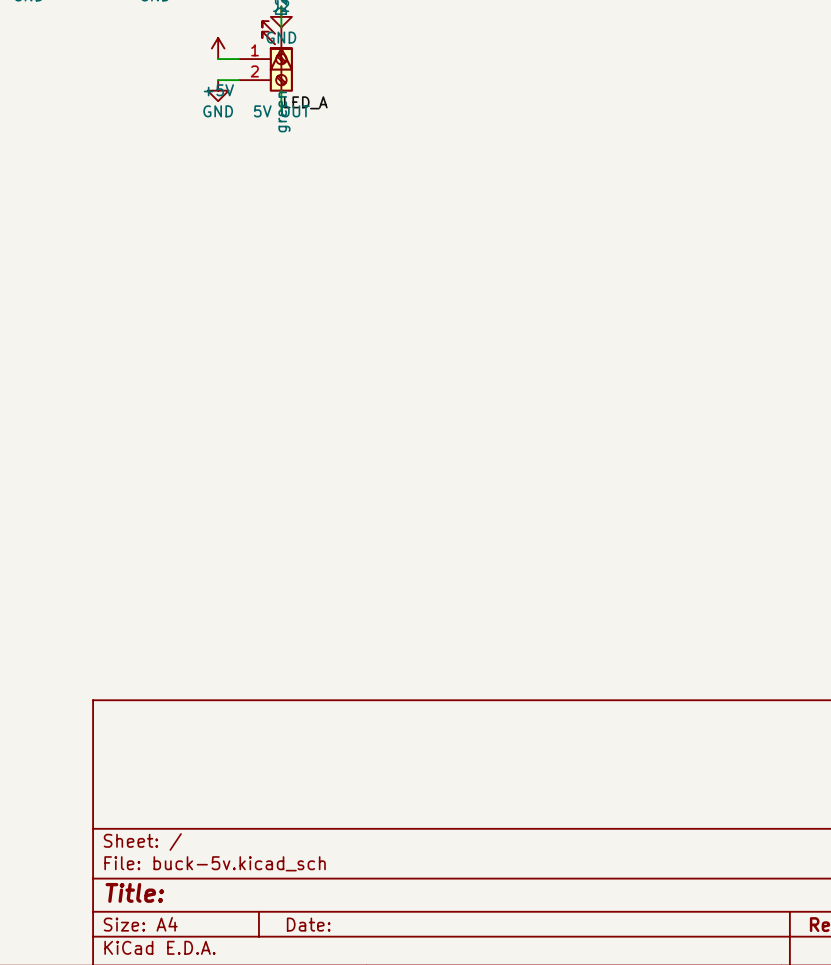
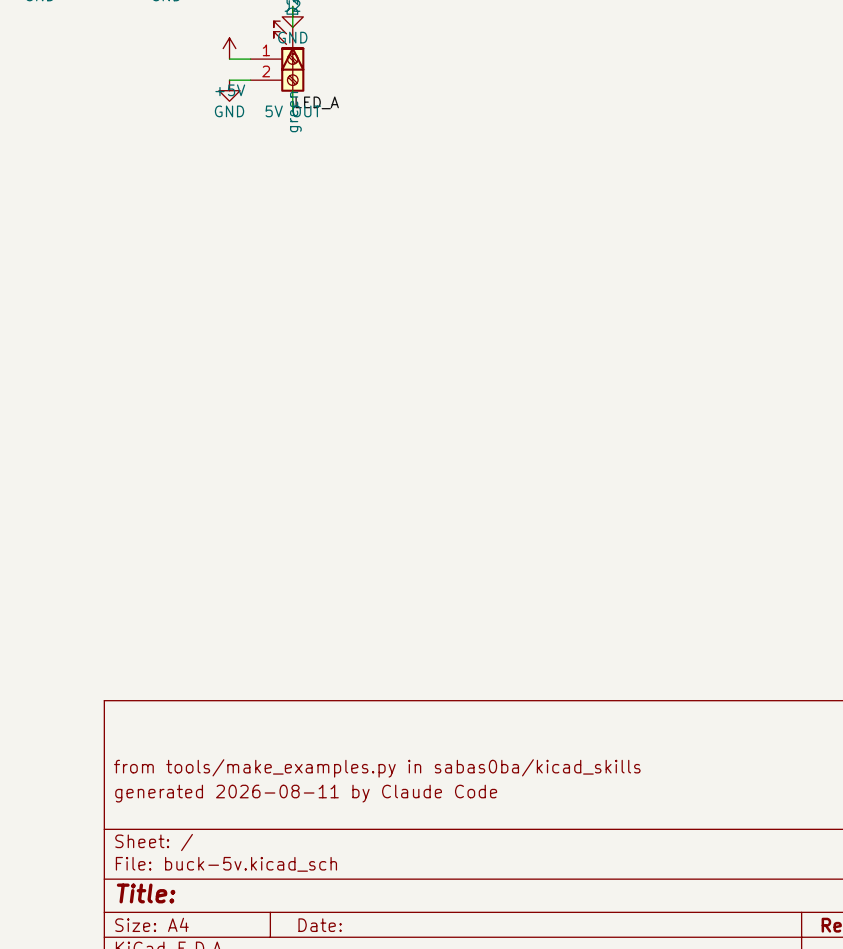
title block: none -> from tools/make_examples.py in sabas0ba/kicad_skills (377, 768)
title block: none -> generated 2026-08-11 by Claude Code (306, 793)

